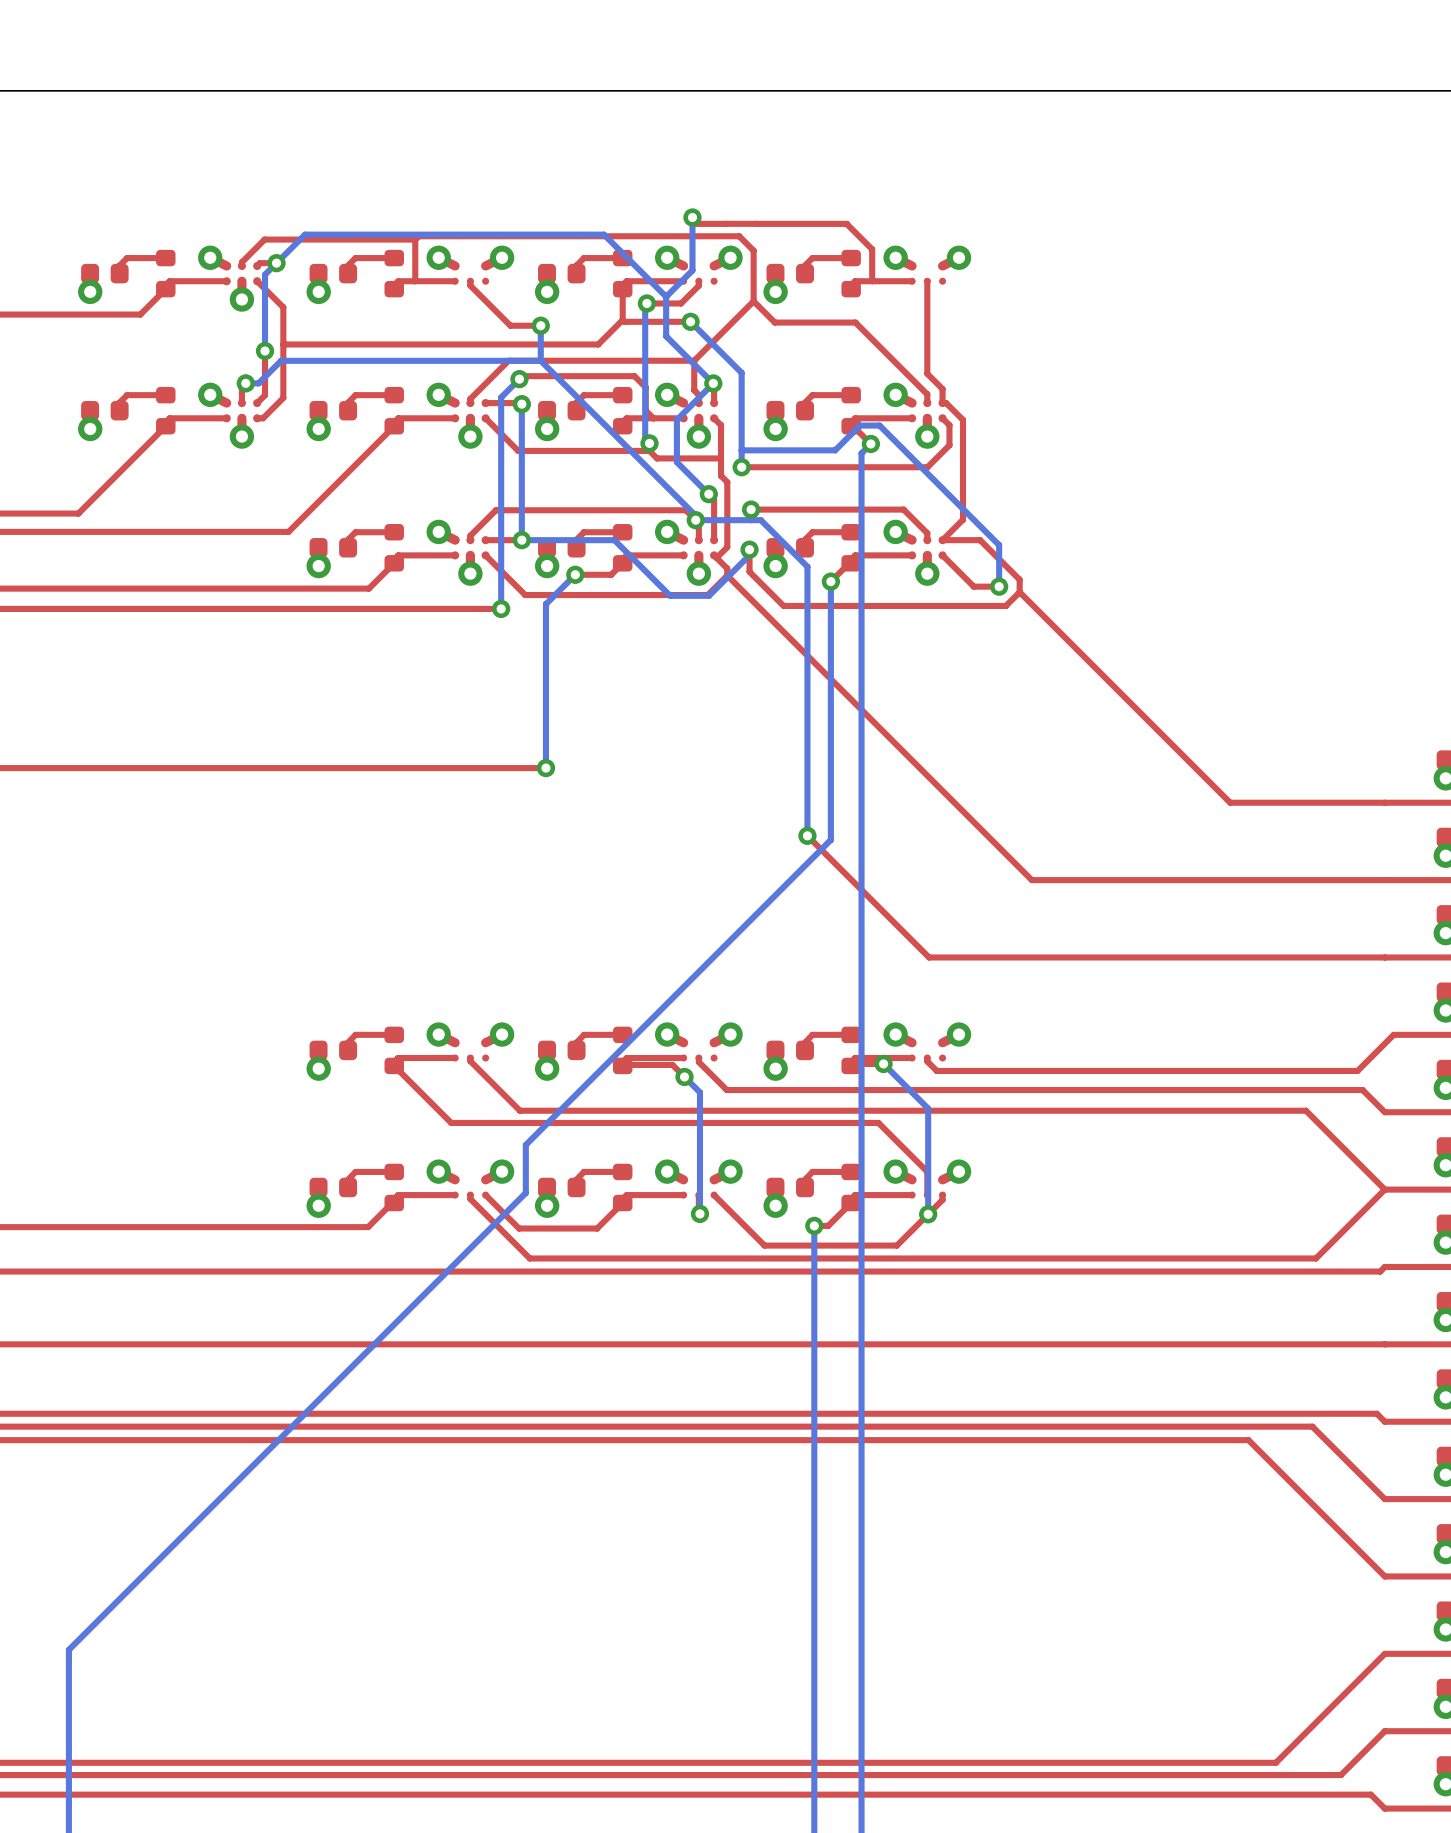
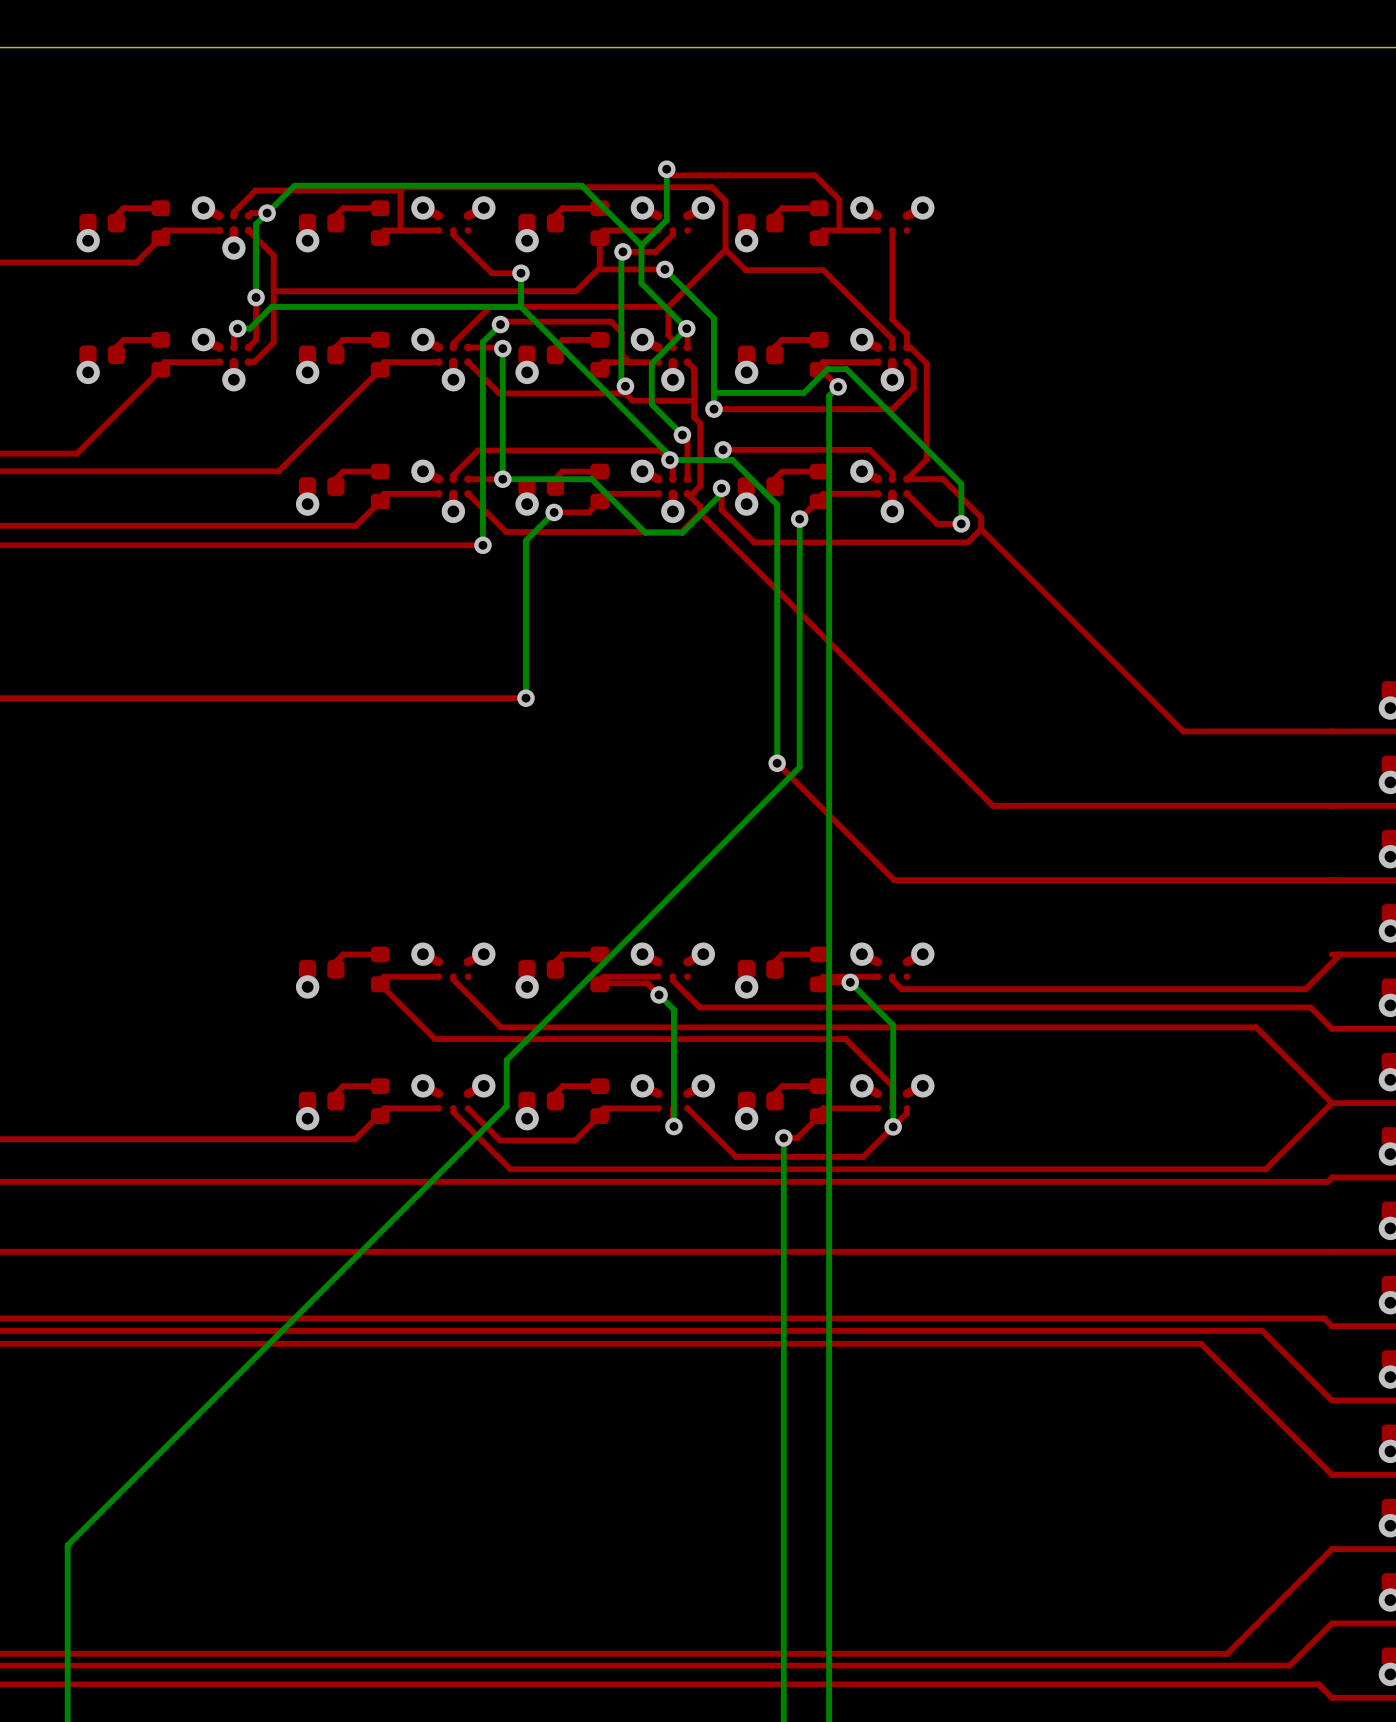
top track: none -> (1340, 954) (1331, 954)

